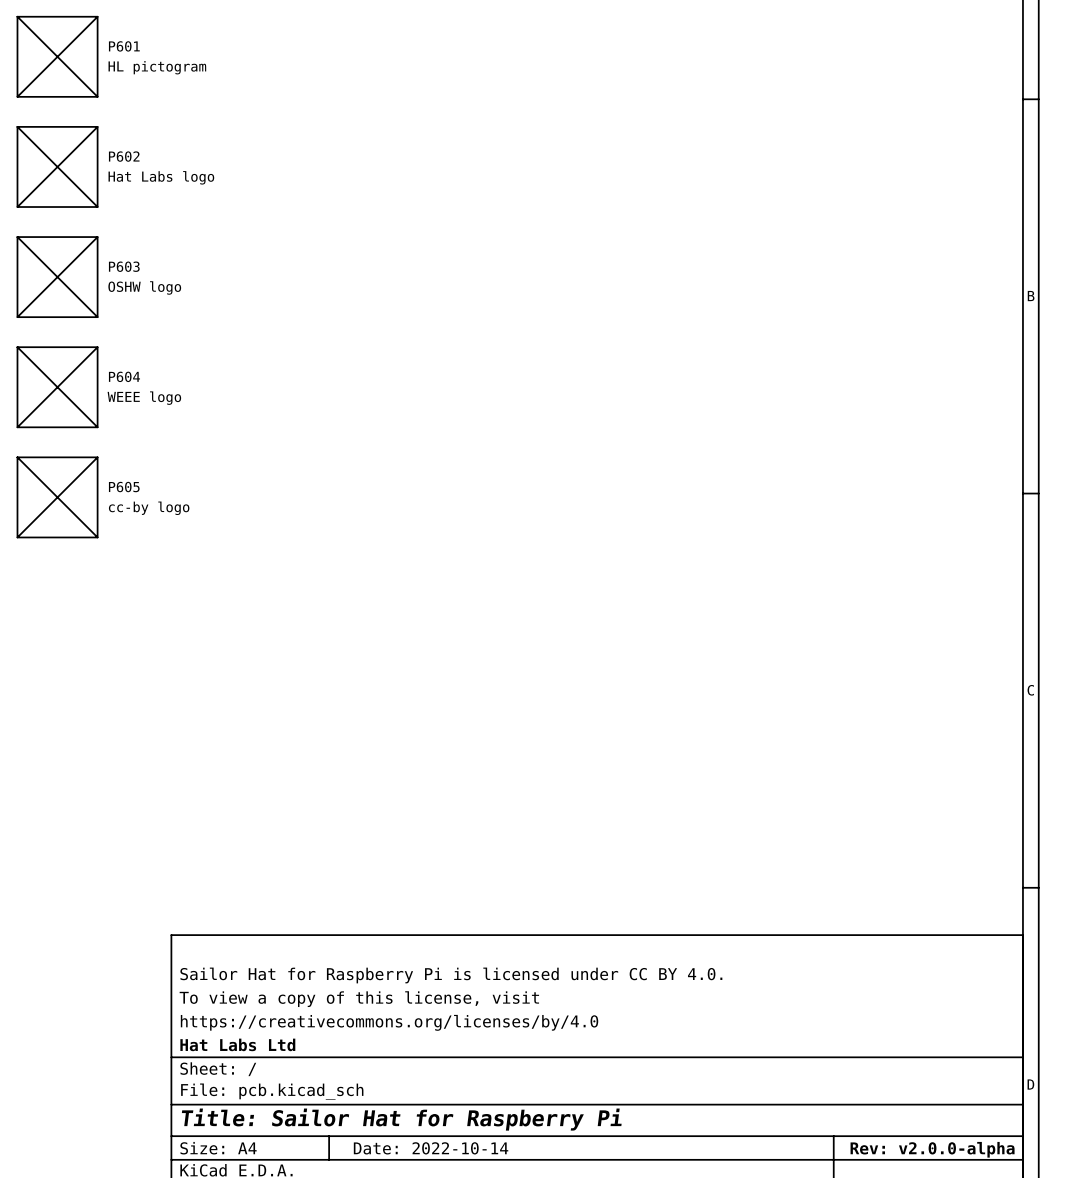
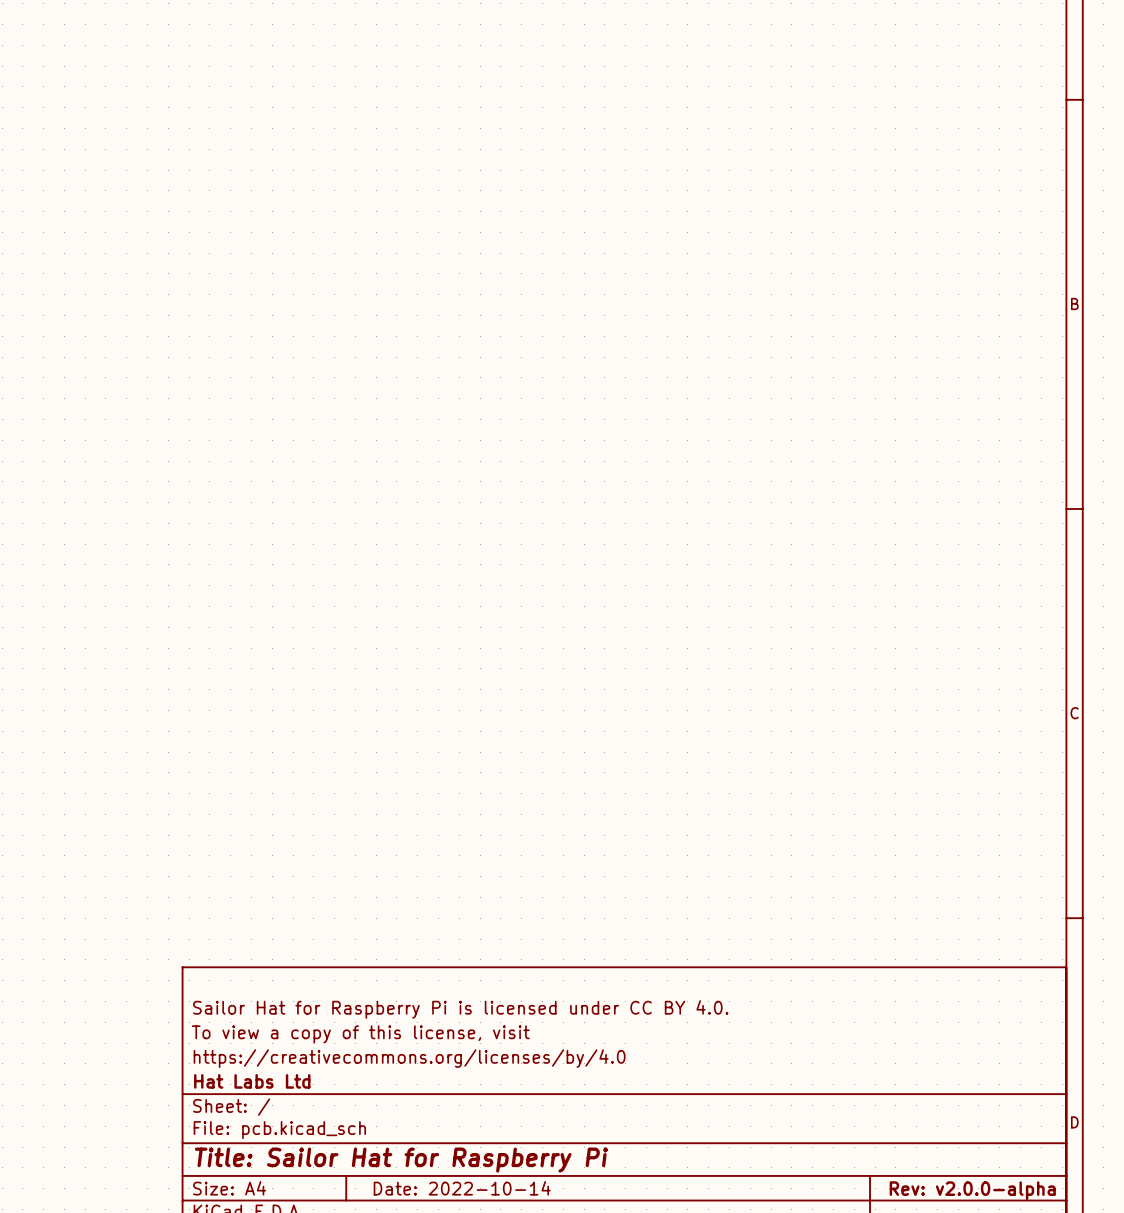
P601: HL pictogram (57, 56) -> none
P602: Hat Labs logo (57, 166) -> none
P603: OSHW logo (57, 277) -> none
P604: WEEE logo (57, 387) -> none
P605: cc-by logo (57, 497) -> none

